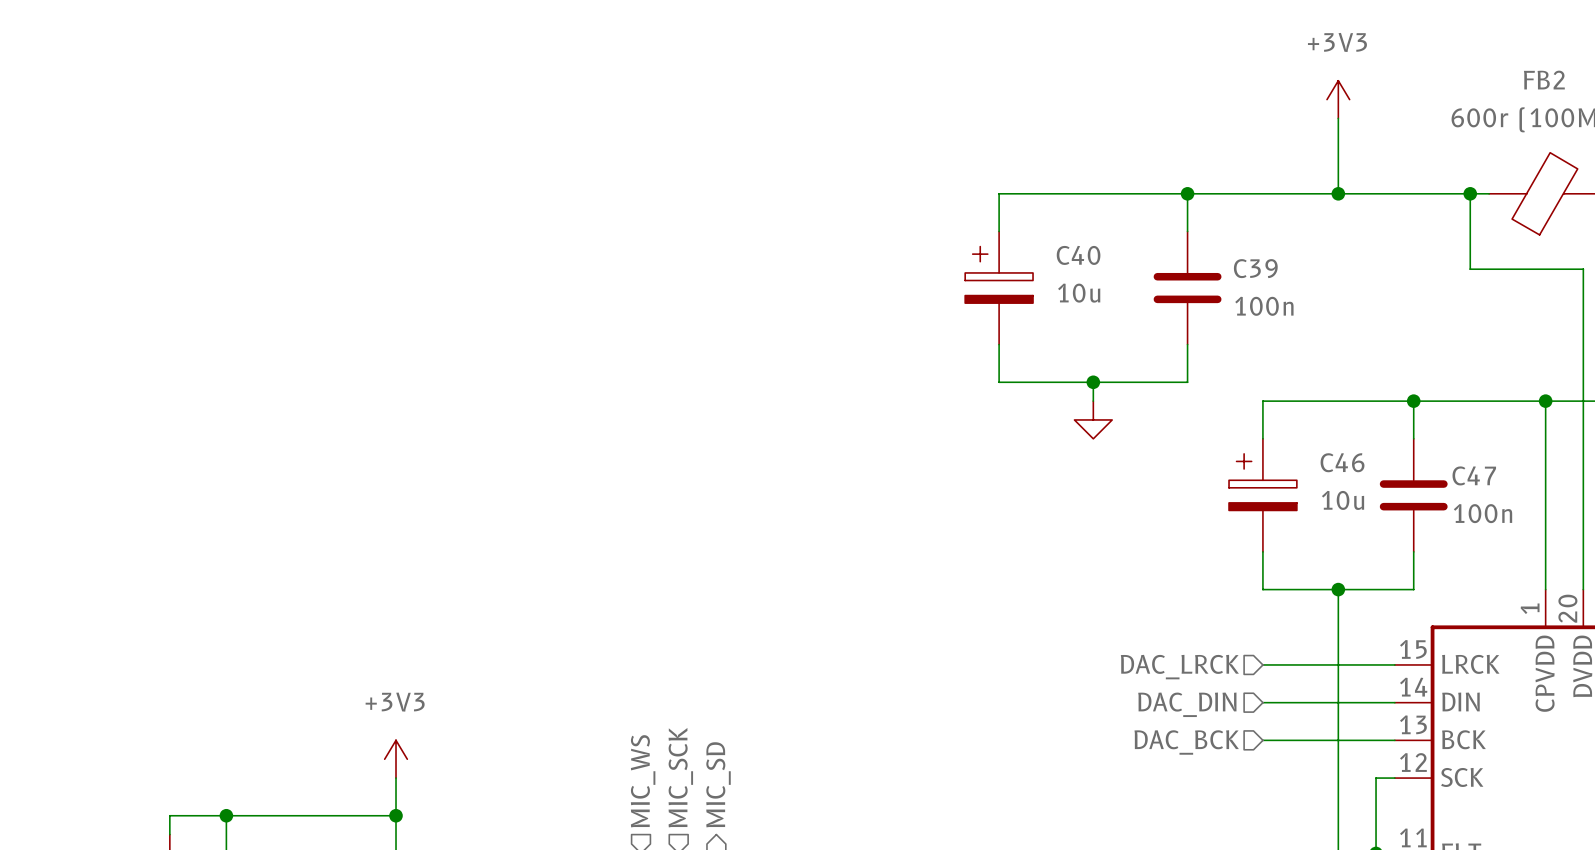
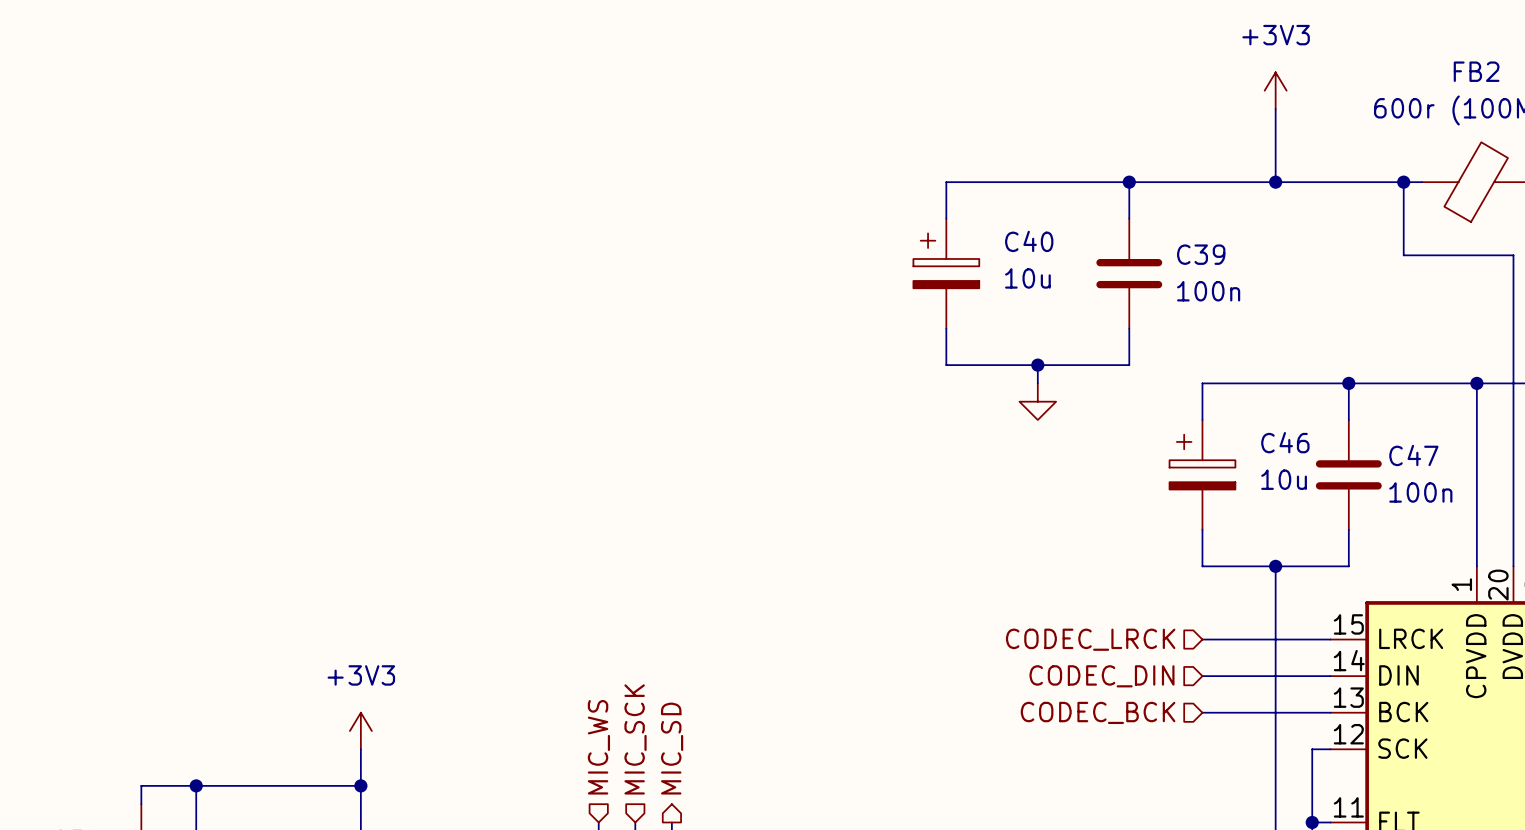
hierarchical label: DAC_LRCK (1179, 667) -> CODEC_LRCK (1090, 639)
hierarchical label: DAC_DIN (1187, 704) -> CODEC_DIN (1101, 676)
hierarchical label: DAC_BCK (1186, 742) -> CODEC_BCK (1098, 712)

